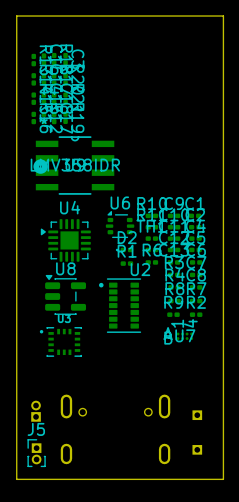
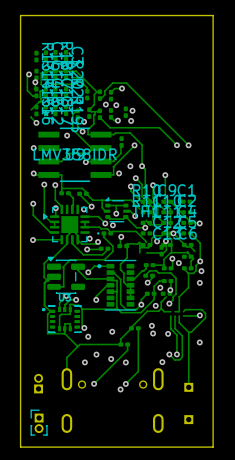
track: none -> (29, 74) (27, 90) (34, 96)
via: none -> (29, 74)
track: none -> (71, 77) (77, 77) (87, 87) (87, 91)
track: none -> (35, 82) (34, 89)
via: none -> (35, 82)
track: none -> (76, 84) (52, 84)
track: none -> (122, 88) (114, 88) (111, 92)
via: none -> (122, 88)
track: none -> (99, 91) (94, 94) (94, 104) (89, 109) (91, 111) (99, 110)
track: none -> (96, 91) (76, 71) (45, 71) (41, 73) (41, 84) (45, 89) (40, 91) (40, 101) (31, 109)
part: none -> (87, 94)
part: none -> (99, 95)
part: none -> (111, 95)
track: none -> (99, 98) (112, 83) (126, 83) (188, 145)
via: none -> (105, 104)
via: none -> (116, 105)
track: none -> (77, 110) (72, 114) (72, 129) (91, 150) (88, 153) (69, 153) (61, 161) (48, 161)
via: none -> (132, 110)
track: none -> (95, 111) (93, 123) (88, 129) (88, 134) (130, 132) (142, 144) (142, 166) (145, 169) (145, 195) (157, 207) (157, 216) (163, 222) (161, 224) (150, 224) (146, 220)
part: none -> (125, 112)
part: none -> (89, 113)
part: none -> (99, 114)
part: none -> (111, 113)
part: none -> (77, 114)
track: none -> (31, 116) (36, 122)
track: none -> (77, 117) (77, 126) (82, 131)
track: none -> (99, 117) (110, 127) (159, 127) (176, 145)
track: none -> (111, 117) (114, 120) (117, 120)
via: none -> (117, 120)
via: none -> (131, 120)
via: none -> (84, 121)
via: none -> (36, 122)
via: none -> (82, 131)
via: none -> (67, 135)
part: none -> (121, 142)
track: none -> (121, 145) (120, 153) (113, 161) (85, 162)
track: none -> (134, 145) (113, 166) (113, 174) (100, 174)
via: none -> (134, 145)
via: none -> (176, 145)
via: none -> (188, 145)
via: none -> (33, 148)
part: (40, 166) -> none
via: none -> (85, 162)
via: none -> (130, 166)
via: none -> (142, 166)
track: none -> (33, 173) (61, 174) (61, 193)
via: none -> (33, 173)
via: none -> (119, 173)
track: none -> (165, 175) (163, 202) (170, 209) (170, 226) (161, 235) (154, 235) (148, 247) (139, 247)
via: none -> (165, 175)
track: none -> (135, 178) (142, 184) (142, 196) (153, 207) (153, 220)
via: none -> (135, 178)
track: none -> (44, 184) (44, 215) (50, 221) (54, 221) (54, 227)
via: none -> (44, 184)
track: none -> (55, 185) (55, 200) (61, 206) (61, 209)
via: none -> (55, 185)
track: none -> (153, 185) (153, 198) (163, 209) (163, 212)
via: none -> (153, 185)
track: none -> (130, 186) (130, 191) (146, 209)
via: none -> (130, 186)
track: none -> (61, 188) (82, 188) (92, 200) (131, 200) (139, 209)
U6 name: U6 (120, 202) -> none
part: none -> (65, 193)
track: none -> (68, 193) (73, 198) (72, 209)
U4 name: U4 (70, 207) -> none
track: none -> (79, 193) (91, 206)
part: none -> (82, 193)
track: none -> (102, 200) (102, 207) (107, 211)
track: none -> (170, 201) (190, 222) (199, 223)
track: none -> (33, 203) (33, 215) (50, 232) (54, 232)
via: none -> (33, 203)
track: none -> (116, 205) (116, 213)
track: none -> (125, 205) (107, 205)
via: none -> (91, 206)
track: none -> (55, 208) (54, 216)
via: none -> (55, 208)
via: none -> (83, 209)
track: none -> (126, 211) (130, 211) (135, 216)
via: none -> (116, 213)
track: none -> (84, 216) (98, 216) (105, 223)
via: none -> (135, 216)
track: none -> (107, 216) (110, 219) (123, 219) (125, 216) (136, 227) (145, 227)
track: none -> (84, 221) (84, 227) (107, 228) (111, 232)
via: none -> (105, 223)
via: none -> (199, 223)
via: none -> (112, 225)
via: none -> (145, 227)
track: none -> (72, 230) (81, 244) (95, 244) (98, 241)
track: none -> (72, 230) (67, 236) (67, 243) (51, 259) (48, 259) (44, 263) (44, 277) (47, 281) (54, 276)
track: none -> (164, 232) (171, 239) (171, 252)
track: none -> (103, 233) (103, 237) (112, 246) (112, 251) (104, 259) (70, 259) (63, 266) (63, 286) (54, 286)
part: none -> (105, 233)
track: none -> (110, 233) (112, 231) (136, 231) (146, 242)
D2: (124, 249) -> none
track: none -> (173, 233) (194, 251)
via: none -> (173, 233)
track: none -> (190, 233) (200, 243) (200, 261) (196, 265) (196, 270) (193, 273) (188, 273)
R6 name: R6 (152, 250) -> none
R1 name: R1 (127, 251) -> none
track: none -> (121, 236) (120, 243)
via: none -> (121, 236)
via: none -> (89, 238)
track: none -> (61, 239) (33, 240)
track: none -> (72, 239) (72, 243) (83, 254) (102, 254) (107, 248)
via: none -> (33, 240)
via: none -> (157, 241)
track: none -> (165, 241) (166, 250) (162, 254) (146, 253)
via: none -> (165, 241)
via: none -> (98, 241)
C7 name: C7 (196, 262) -> none
track: none -> (101, 248) (87, 249)
part: none -> (104, 248)
via: none -> (87, 249)
part: none -> (161, 250)
U2 name: U2 (140, 269) -> none
track: none -> (187, 251) (187, 252)
track: none -> (139, 253) (139, 242) (127, 243) (127, 257) (120, 264) (120, 269) (123, 273) (123, 282) (130, 285) (130, 297)
track: none -> (187, 252) (170, 252) (163, 259) (165, 267)
track: none -> (187, 252) (193, 258) (191, 261) (191, 268)
R3: (174, 274) -> none
R4 name: R4 (175, 274) -> none
C8 name: C8 (196, 275) -> none
track: none -> (172, 258) (172, 267)
via: none -> (172, 258)
via: none -> (200, 261)
via: none -> (178, 263)
track: none -> (146, 265) (143, 271) (134, 278) (130, 278)
part: none -> (149, 265)
track: none -> (163, 265) (153, 265)
track: none -> (78, 266) (78, 270) (86, 278) (117, 280) (117, 291) (110, 291)
track: none -> (110, 266) (94, 266) (88, 272)
track: none -> (184, 268) (188, 273)
R8 name: R8 (174, 288) -> none
via: none -> (201, 271)
via: none -> (88, 272)
track: none -> (110, 272) (113, 272) (120, 279) (120, 304) (126, 309) (136, 309) (141, 304) (141, 299) (147, 293)
track: none -> (188, 273) (188, 287) (179, 296) (179, 311) (175, 311)
U8: (65, 294) -> none
part: none -> (66, 275)
track: none -> (145, 275) (149, 270) (156, 270) (158, 273) (170, 273) (176, 278) (176, 294) (169, 303)
part: none -> (149, 275)
track: none -> (152, 275) (147, 282)
track: none -> (47, 280) (44, 282) (44, 305) (50, 311)
track: none -> (164, 281) (159, 281) (154, 286) (154, 299) (141, 312) (121, 312) (116, 308)
track: none -> (170, 281) (170, 290)
R7: (196, 301) -> none
via: none -> (147, 282)
R9 name: R9 (173, 302) -> none
via: none -> (199, 282)
track: none -> (110, 285) (107, 285) (96, 296) (96, 299)
via: none -> (160, 287)
via: none -> (170, 290)
track: none -> (116, 291) (116, 308)
part: none -> (150, 293)
R2: (196, 314) -> none
track: none -> (66, 295) (59, 302) (59, 309)
via: none -> (66, 295)
track: none -> (166, 296) (161, 302) (161, 308)
track: none -> (76, 299) (70, 299) (64, 304) (64, 309)
via: none -> (76, 299)
via: none -> (96, 299)
via: none -> (169, 303)
via: none -> (141, 304)
via: none -> (155, 305)
track: none -> (116, 308) (82, 309)
track: none -> (161, 308) (158, 311) (147, 311) (120, 338) (120, 344) (79, 344) (66, 357) (66, 379)
track: none -> (161, 308) (164, 311) (170, 311)
track: none -> (183, 311) (185, 309) (201, 309) (205, 313) (205, 317) (191, 332) (188, 332)
track: none -> (49, 312) (47, 314) (47, 333) (64, 333)
U7: (184, 336) -> none
track: none -> (199, 315) (183, 315)
via: none -> (199, 315)
track: none -> (170, 315) (170, 328) (176, 335) (176, 354)
track: none -> (175, 315) (175, 328) (182, 335) (182, 357) (179, 359) (174, 359) (169, 354)
track: none -> (179, 315) (179, 322) (188, 332)
part: none -> (61, 319)
via: none -> (151, 325)
track: none -> (82, 327) (82, 308) (78, 305) (70, 304) (70, 314) (59, 315) (59, 328)
via: none -> (84, 327)
part: none -> (134, 328)
track: none -> (138, 328) (138, 371) (125, 383)
track: none -> (70, 328) (70, 323) (64, 323) (64, 333)
via: none -> (112, 331)
track: none -> (188, 332) (188, 387)
track: none -> (64, 333) (77, 346)
via: none -> (153, 333)
via: none -> (168, 333)
via: none -> (88, 336)
via: none -> (199, 342)
part: none -> (124, 344)
track: none -> (127, 344) (127, 350) (94, 383)
via: none -> (169, 354)
via: none -> (176, 354)
via: none -> (96, 354)
via: none -> (111, 359)
via: none -> (84, 362)
via: none -> (125, 362)
via: none -> (162, 362)
via: none -> (94, 383)
via: none -> (125, 383)
via: none -> (120, 389)
J5 name: J5 (36, 429) -> none

